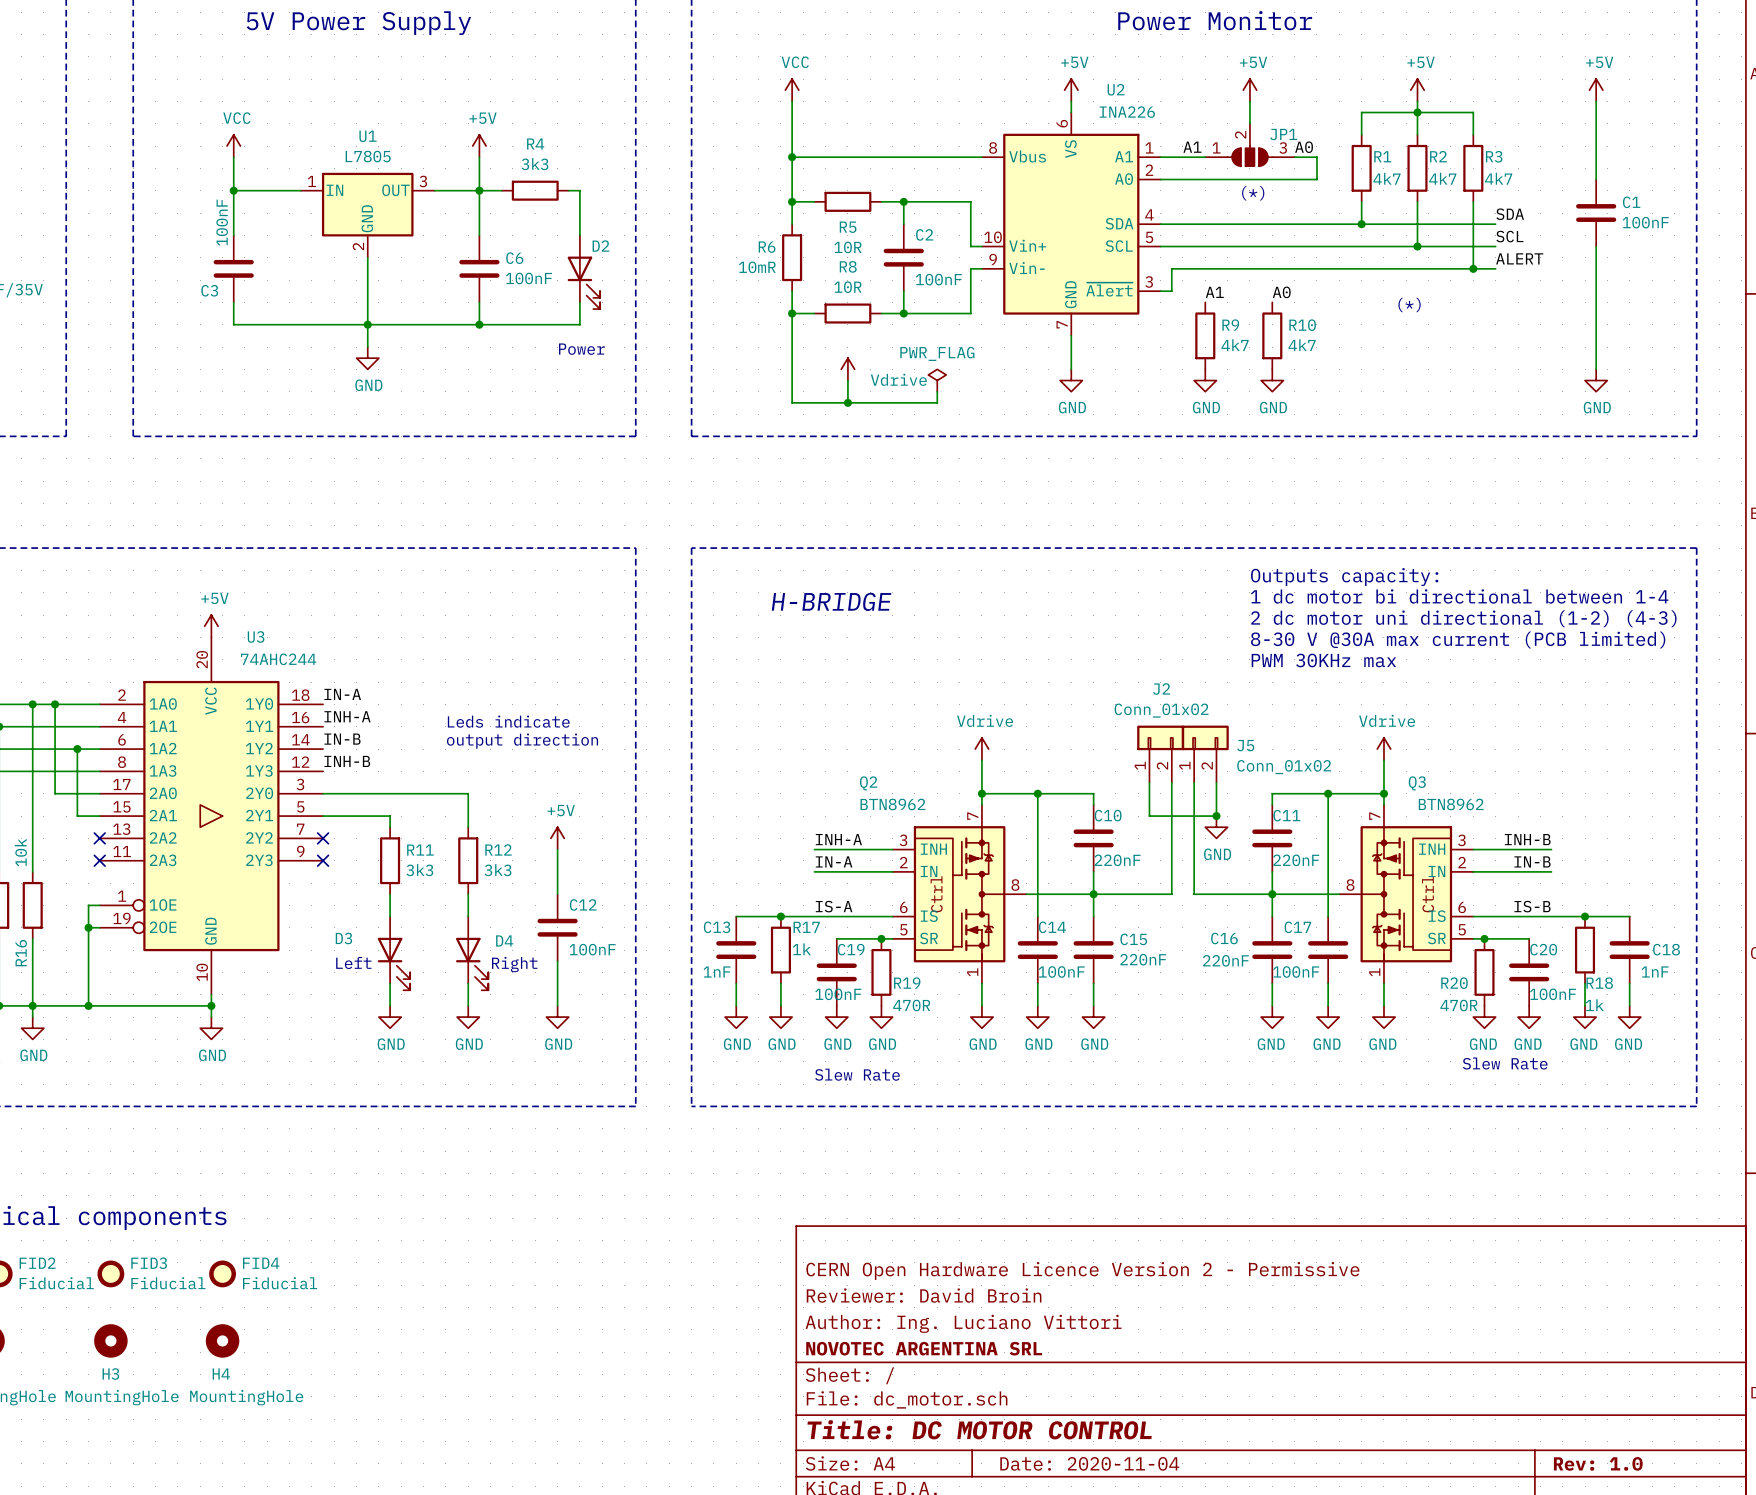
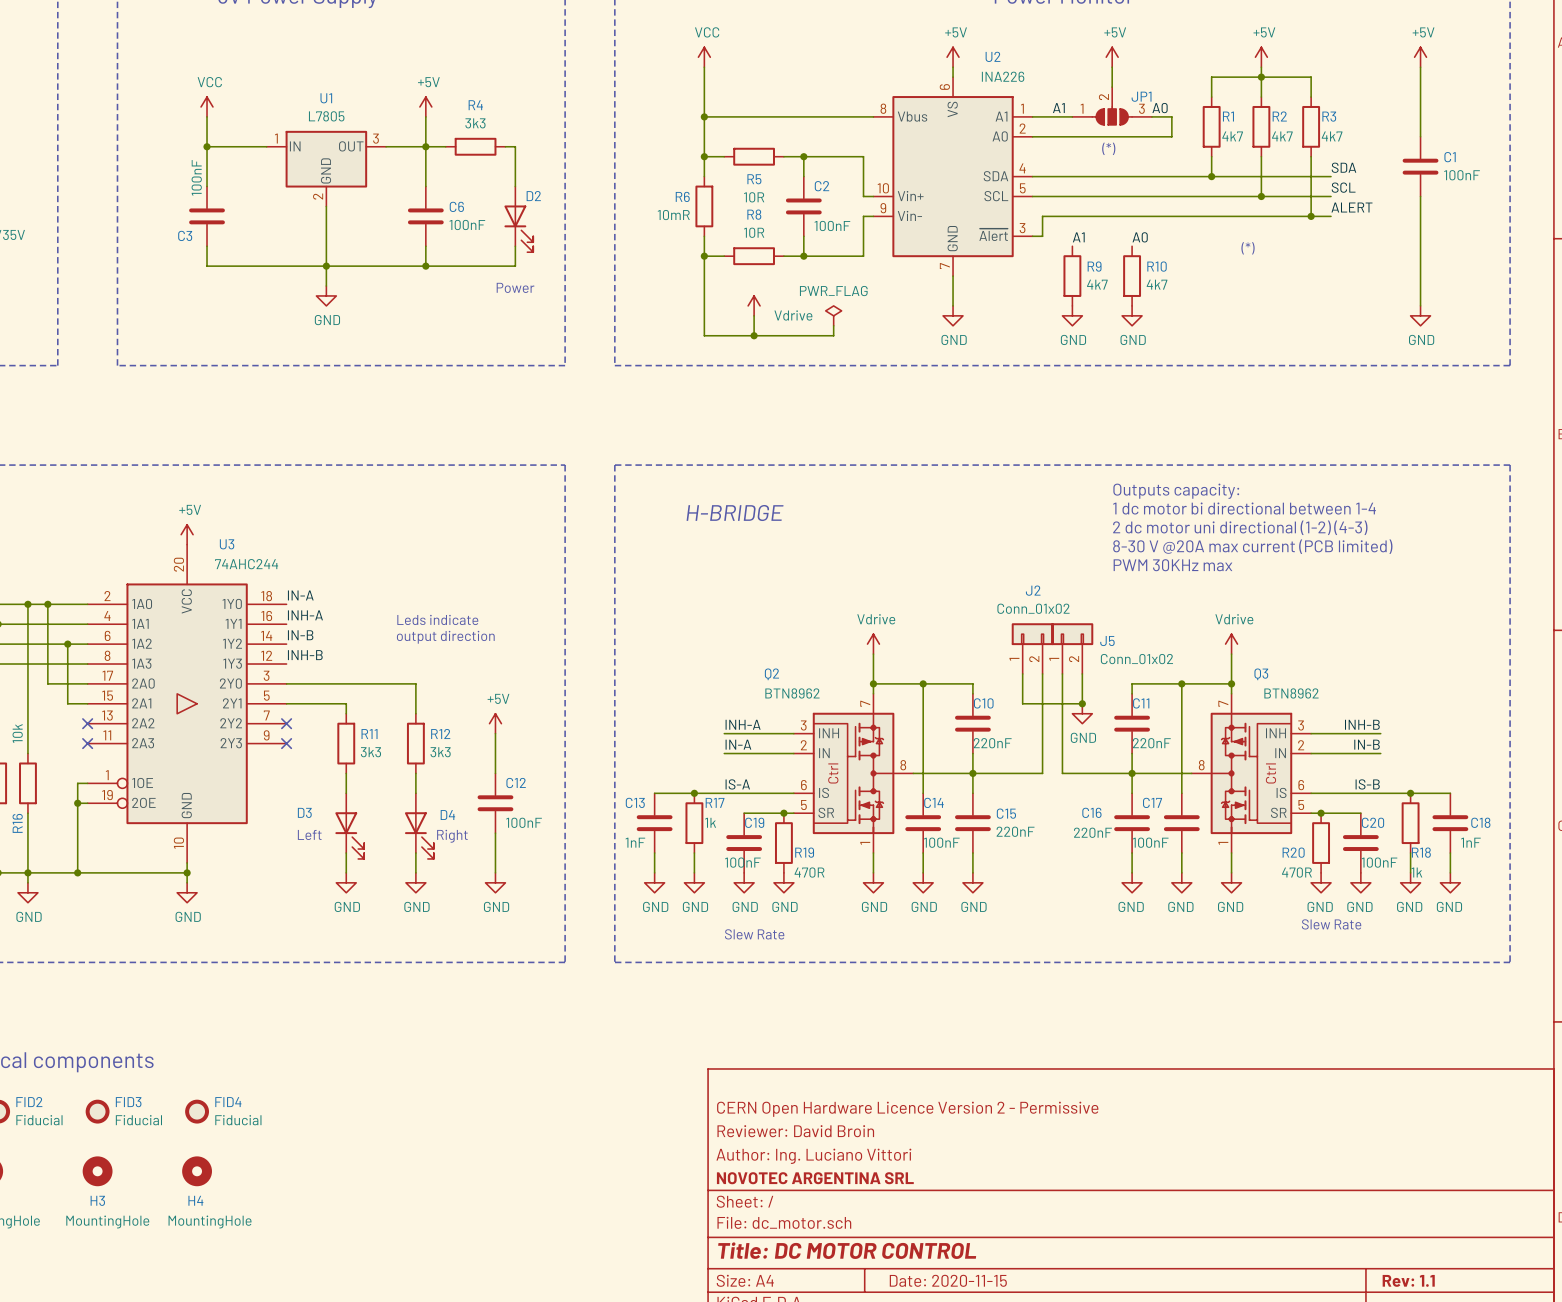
text: 8-30 V @30A max current (PCB limited) (1458, 639) -> 8-30 V @20A max current (PCB limited) (1252, 546)
title block: Date: 2020-11-04 (1089, 1463) -> Date: 2020-11-15 (948, 1280)
title block: Rev: 1.0 (1598, 1463) -> Rev: 1.1 (1408, 1280)

